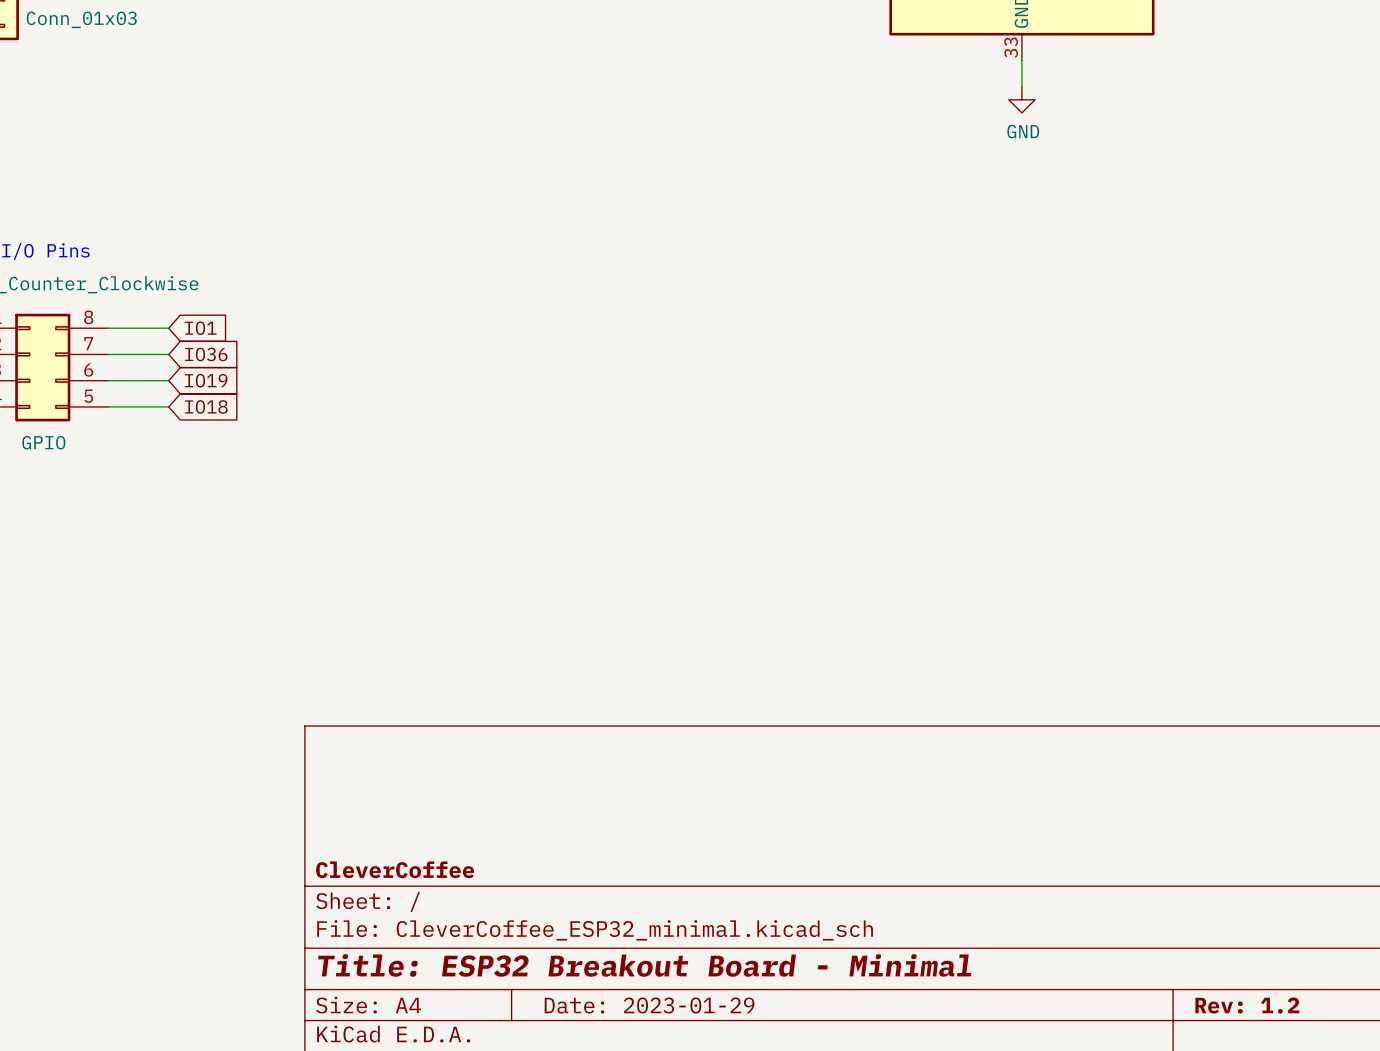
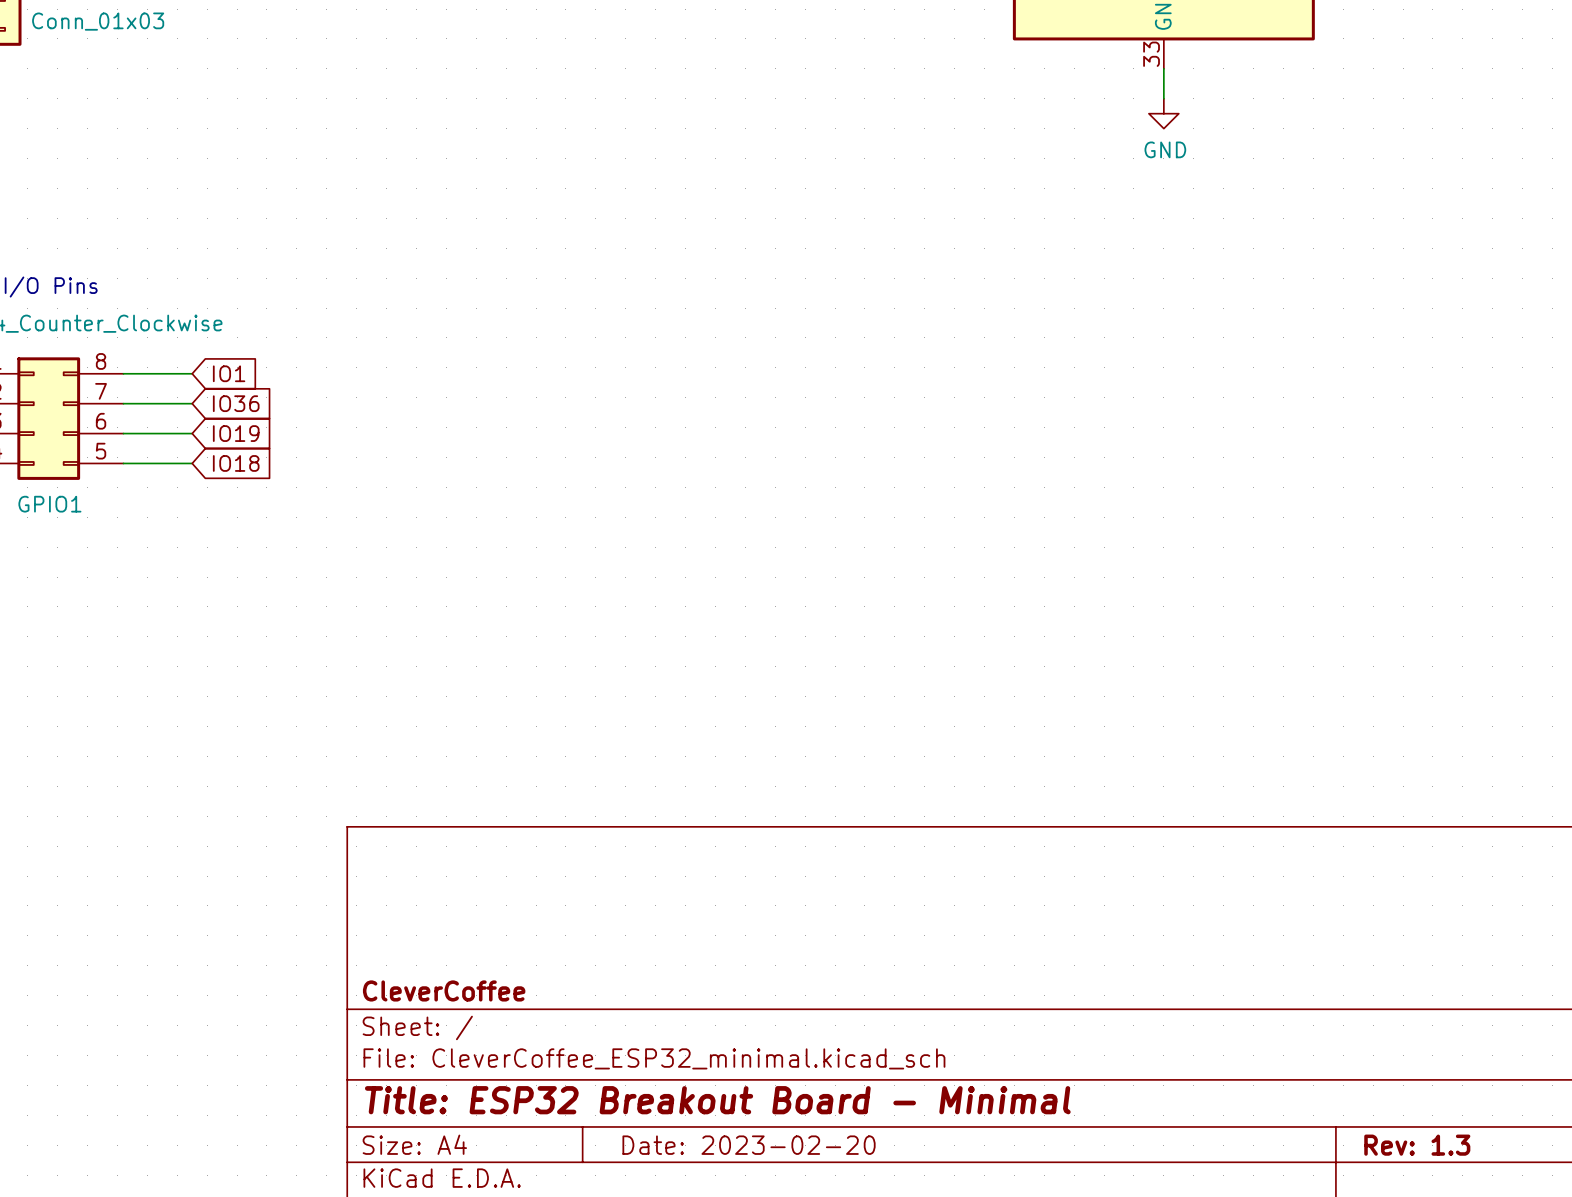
GPIO name: GPIO (43, 442) -> GPIO1 (49, 504)
title block: Date: 2023-01-29 (649, 1005) -> Date: 2023-02-20 (749, 1145)
title block: Rev: 1.2 (1247, 1005) -> Rev: 1.3 (1417, 1145)

